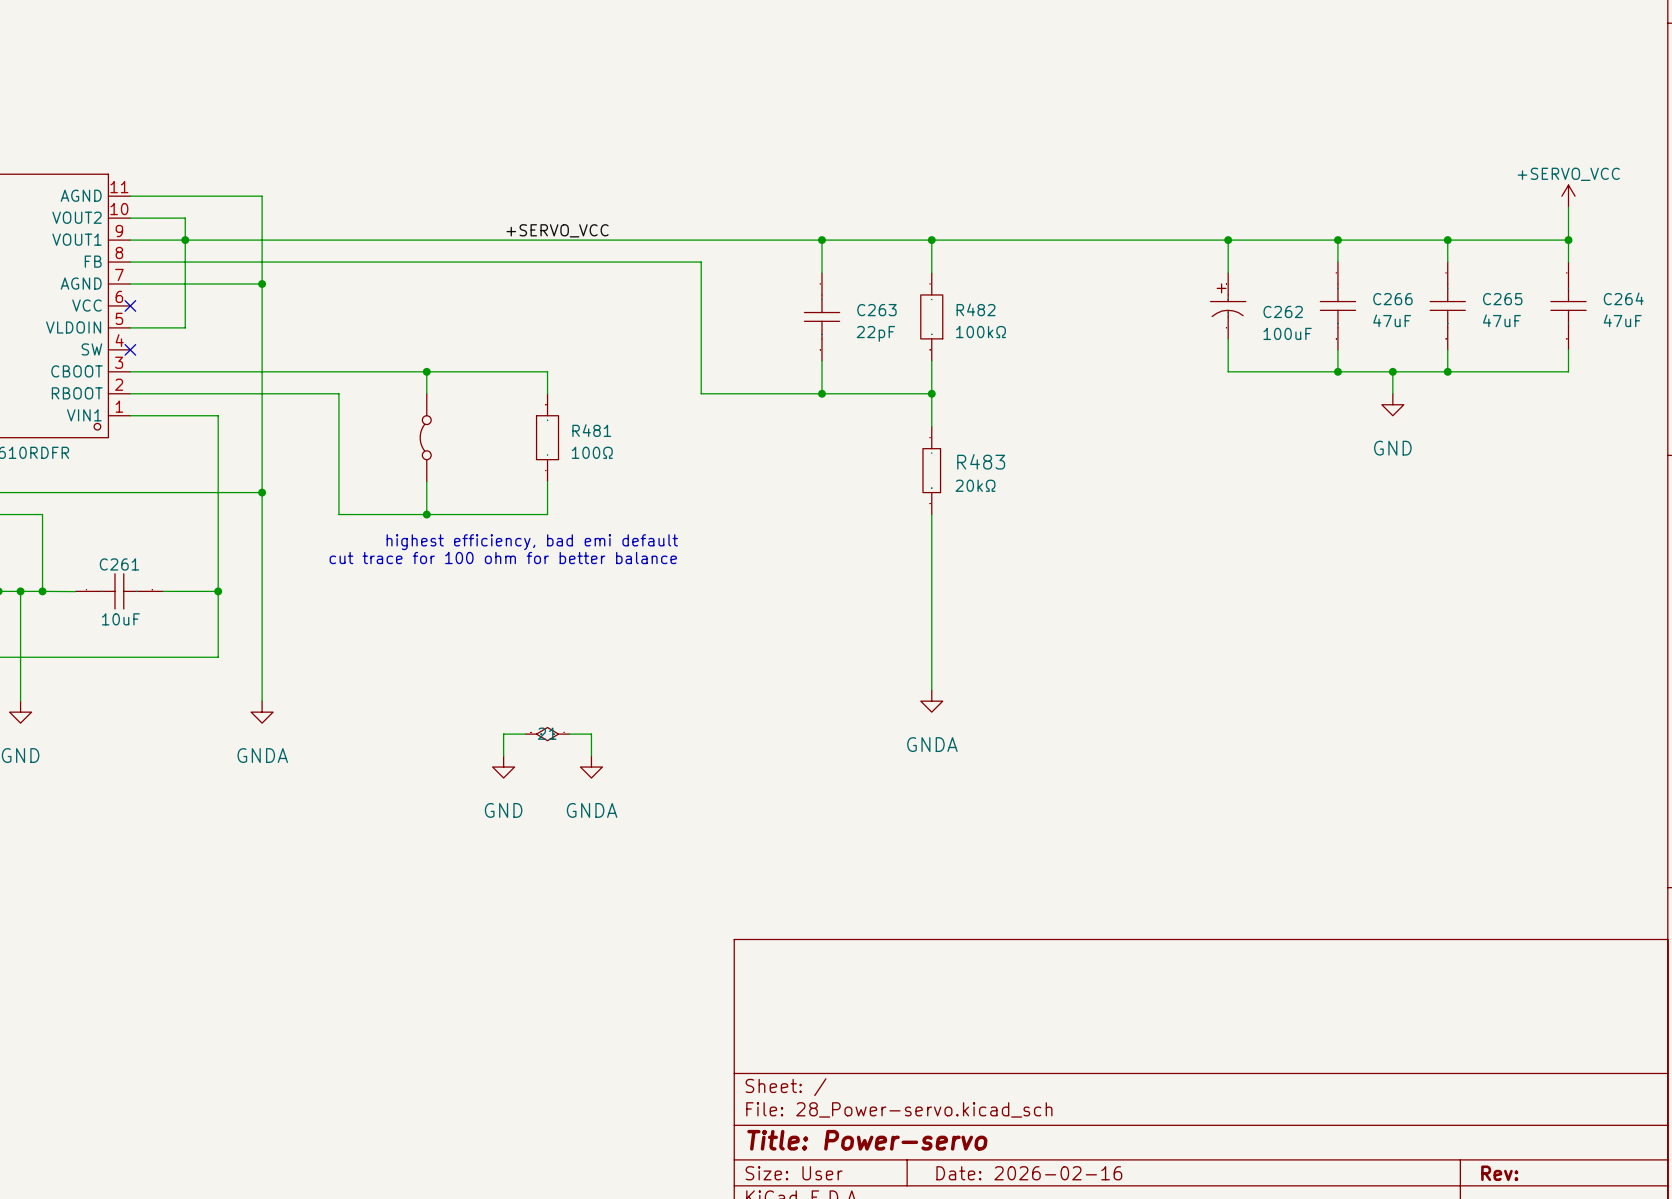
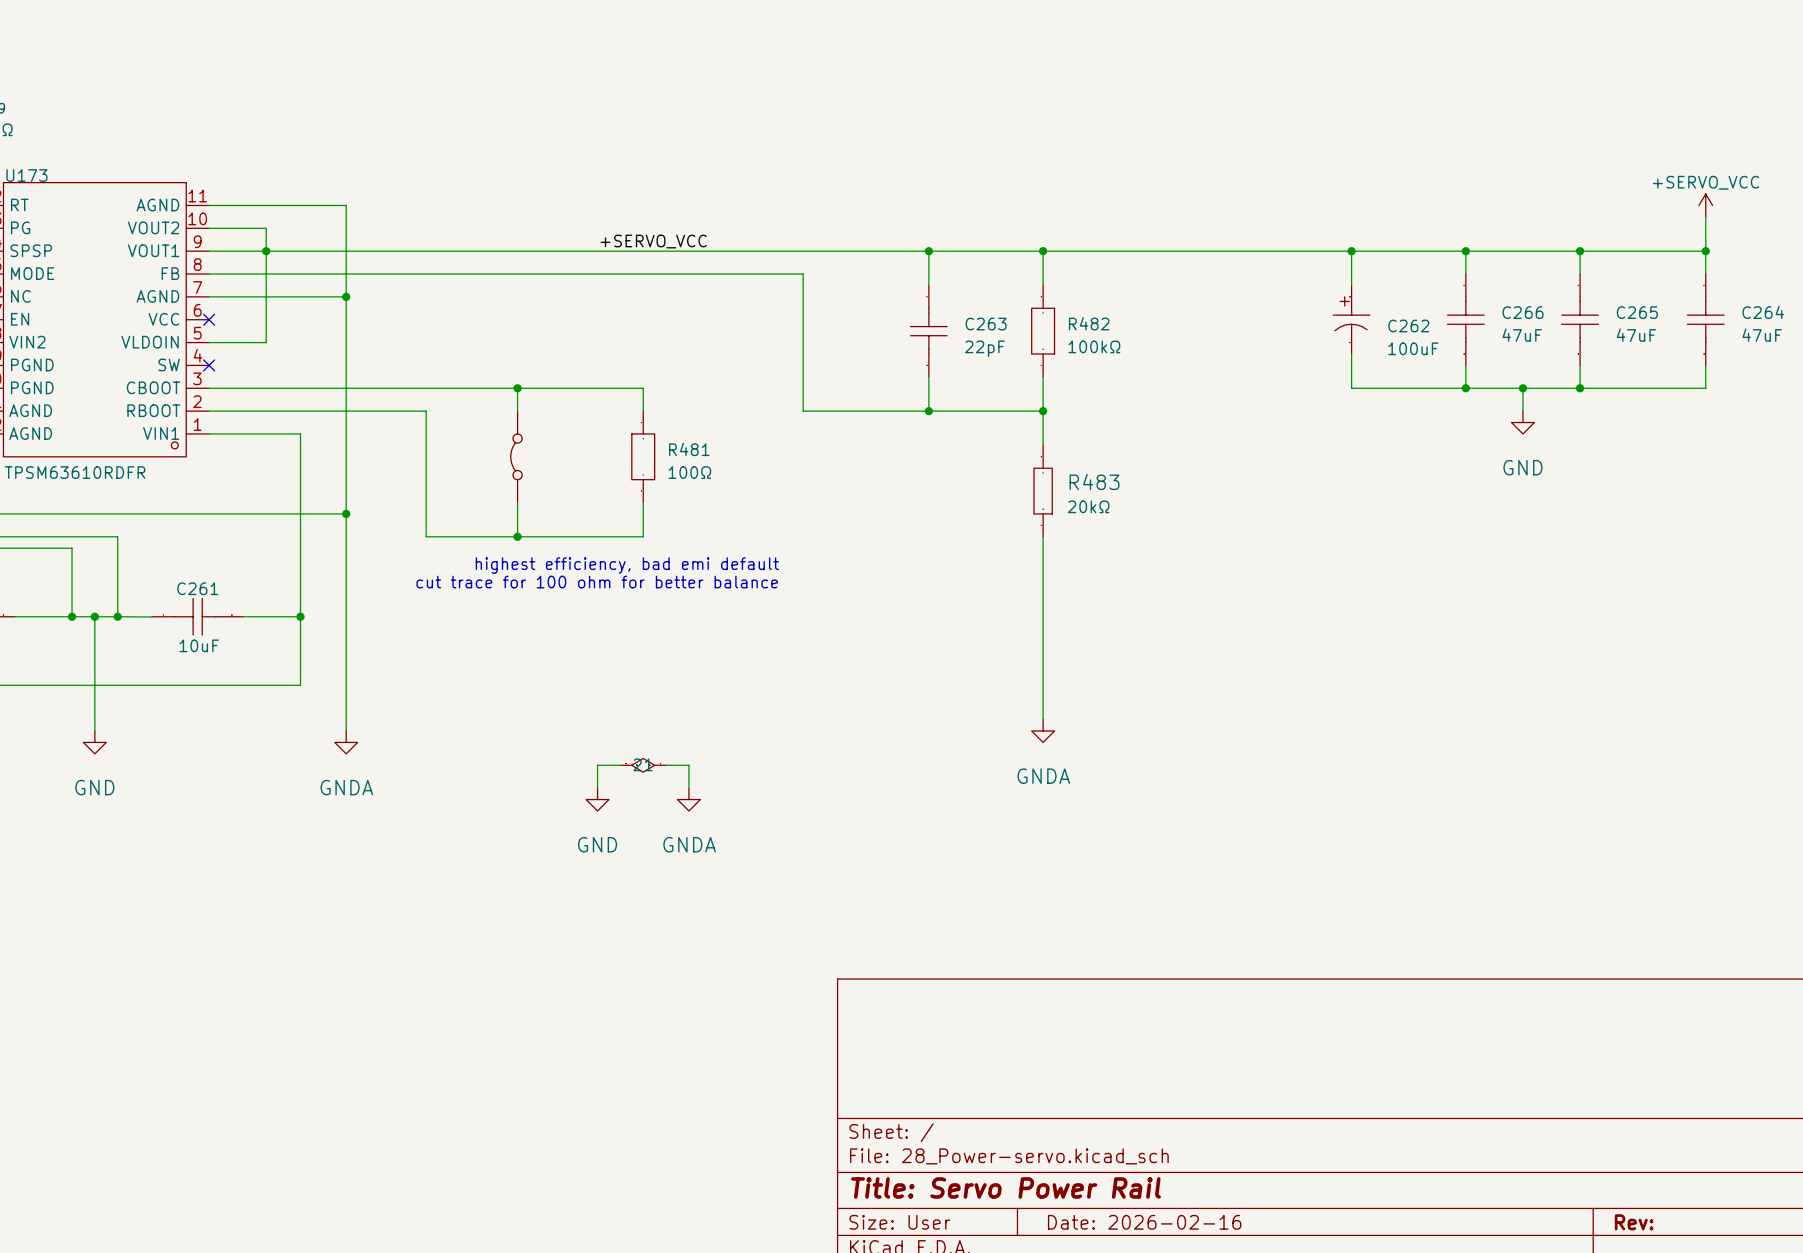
title block: Title: Power-servo (867, 1140) -> Title: Servo Power Rail (1005, 1187)

